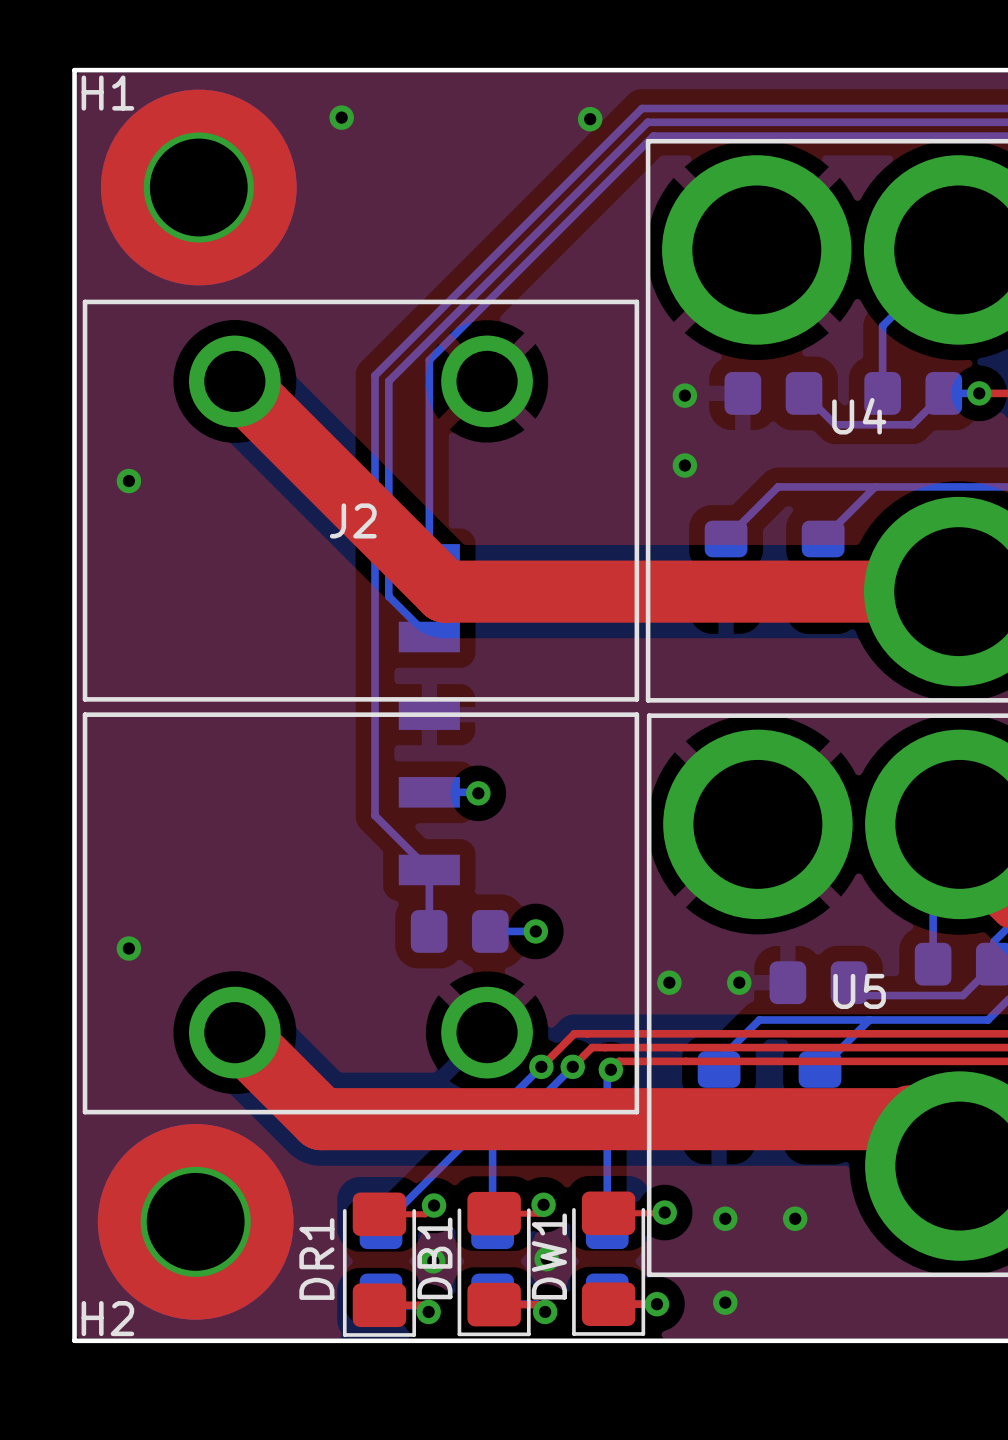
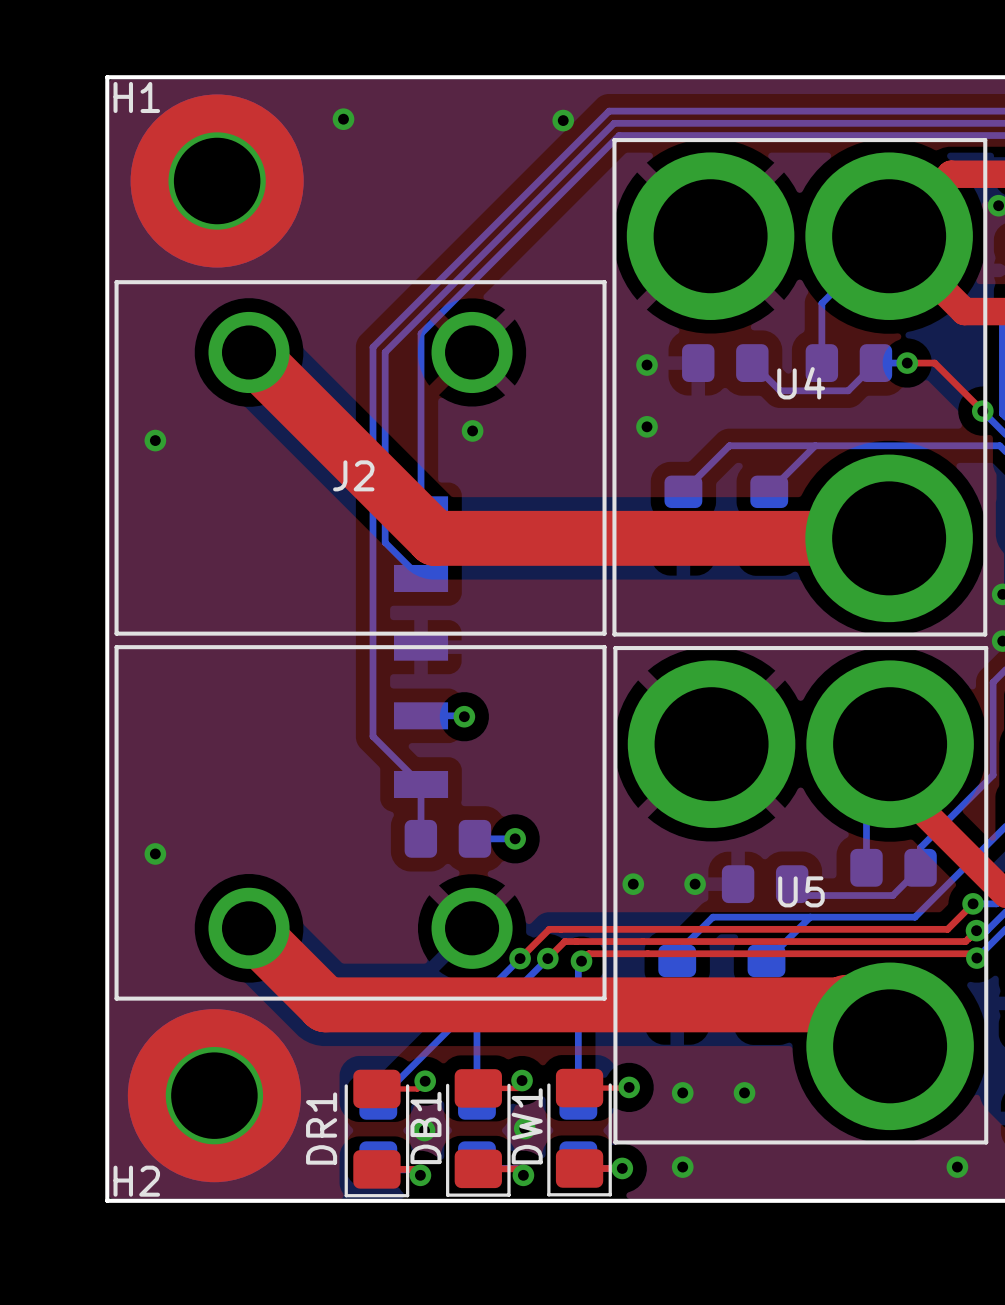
via: none -> (472, 430)

